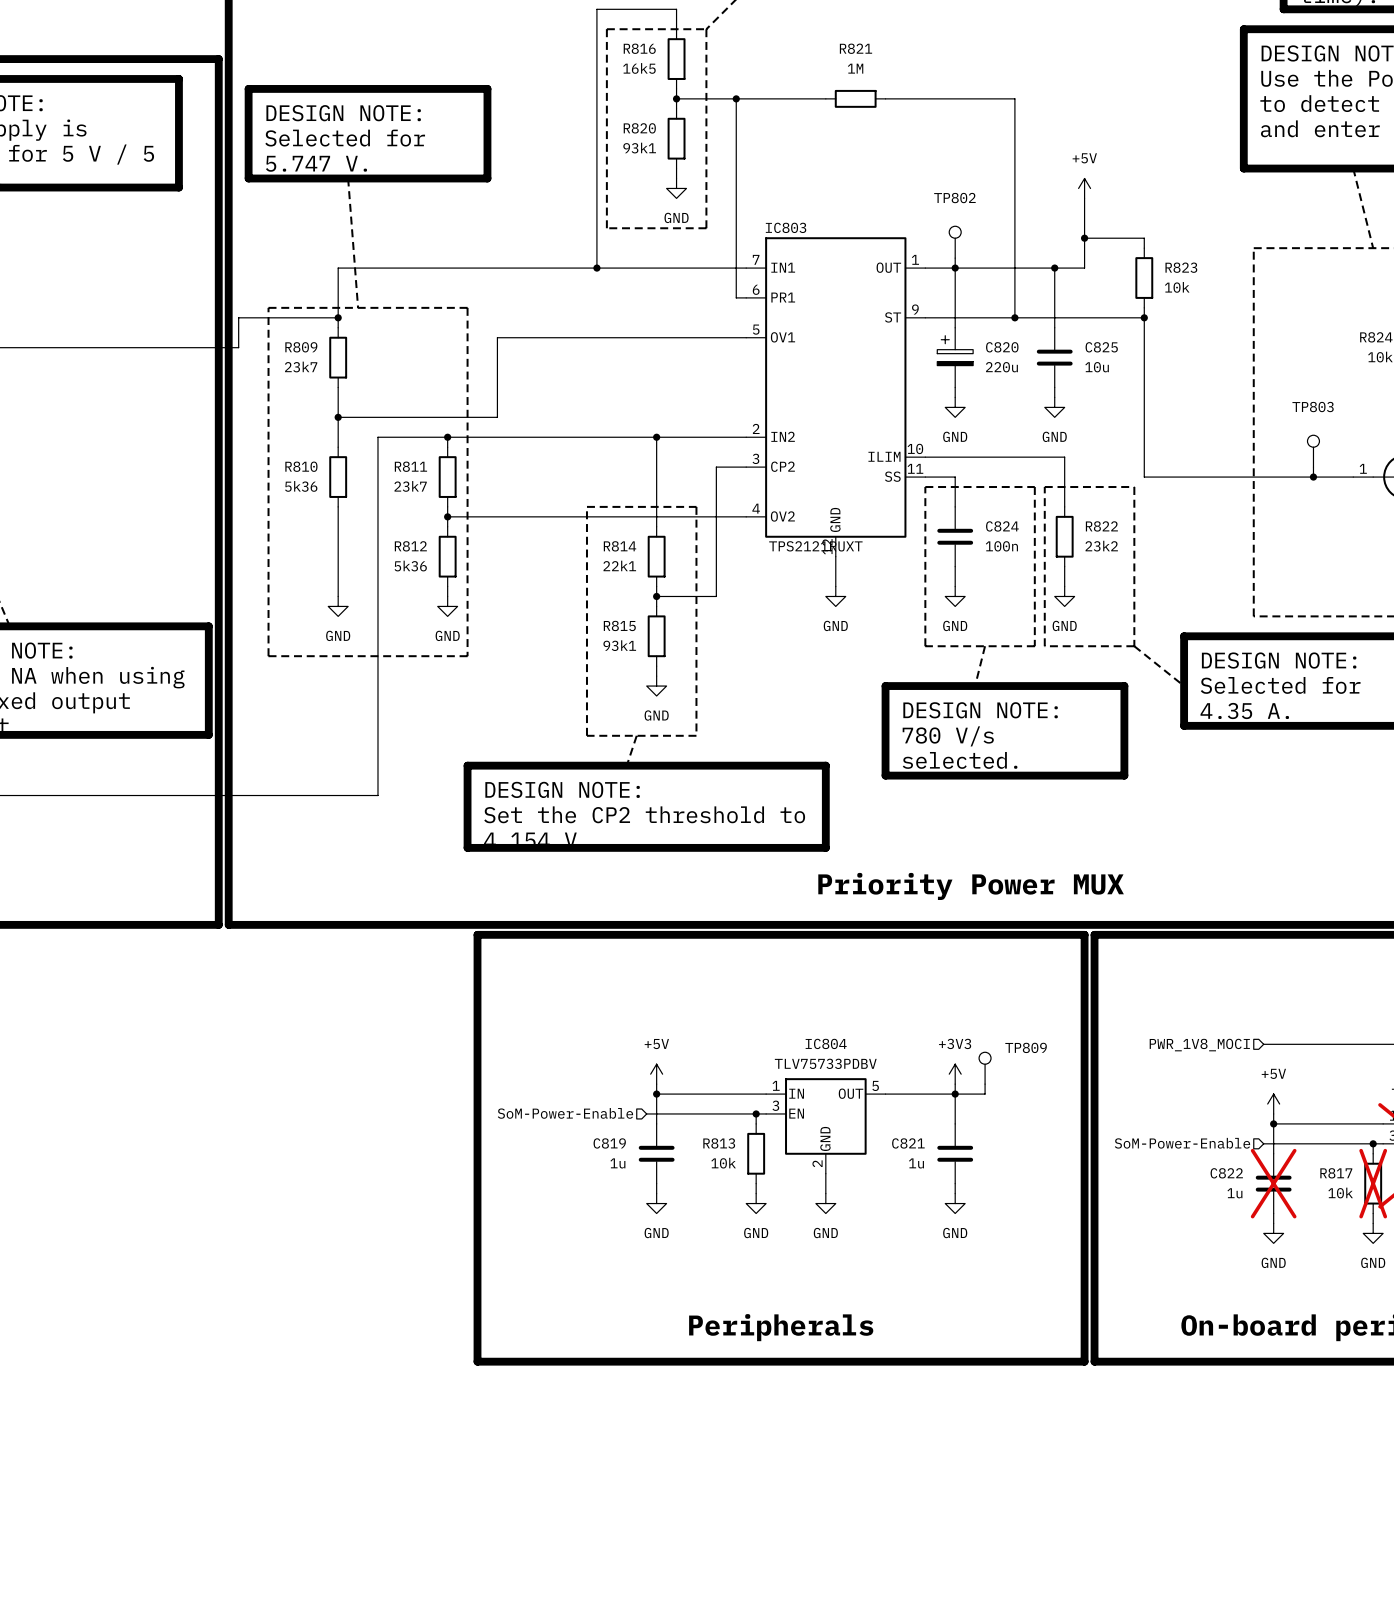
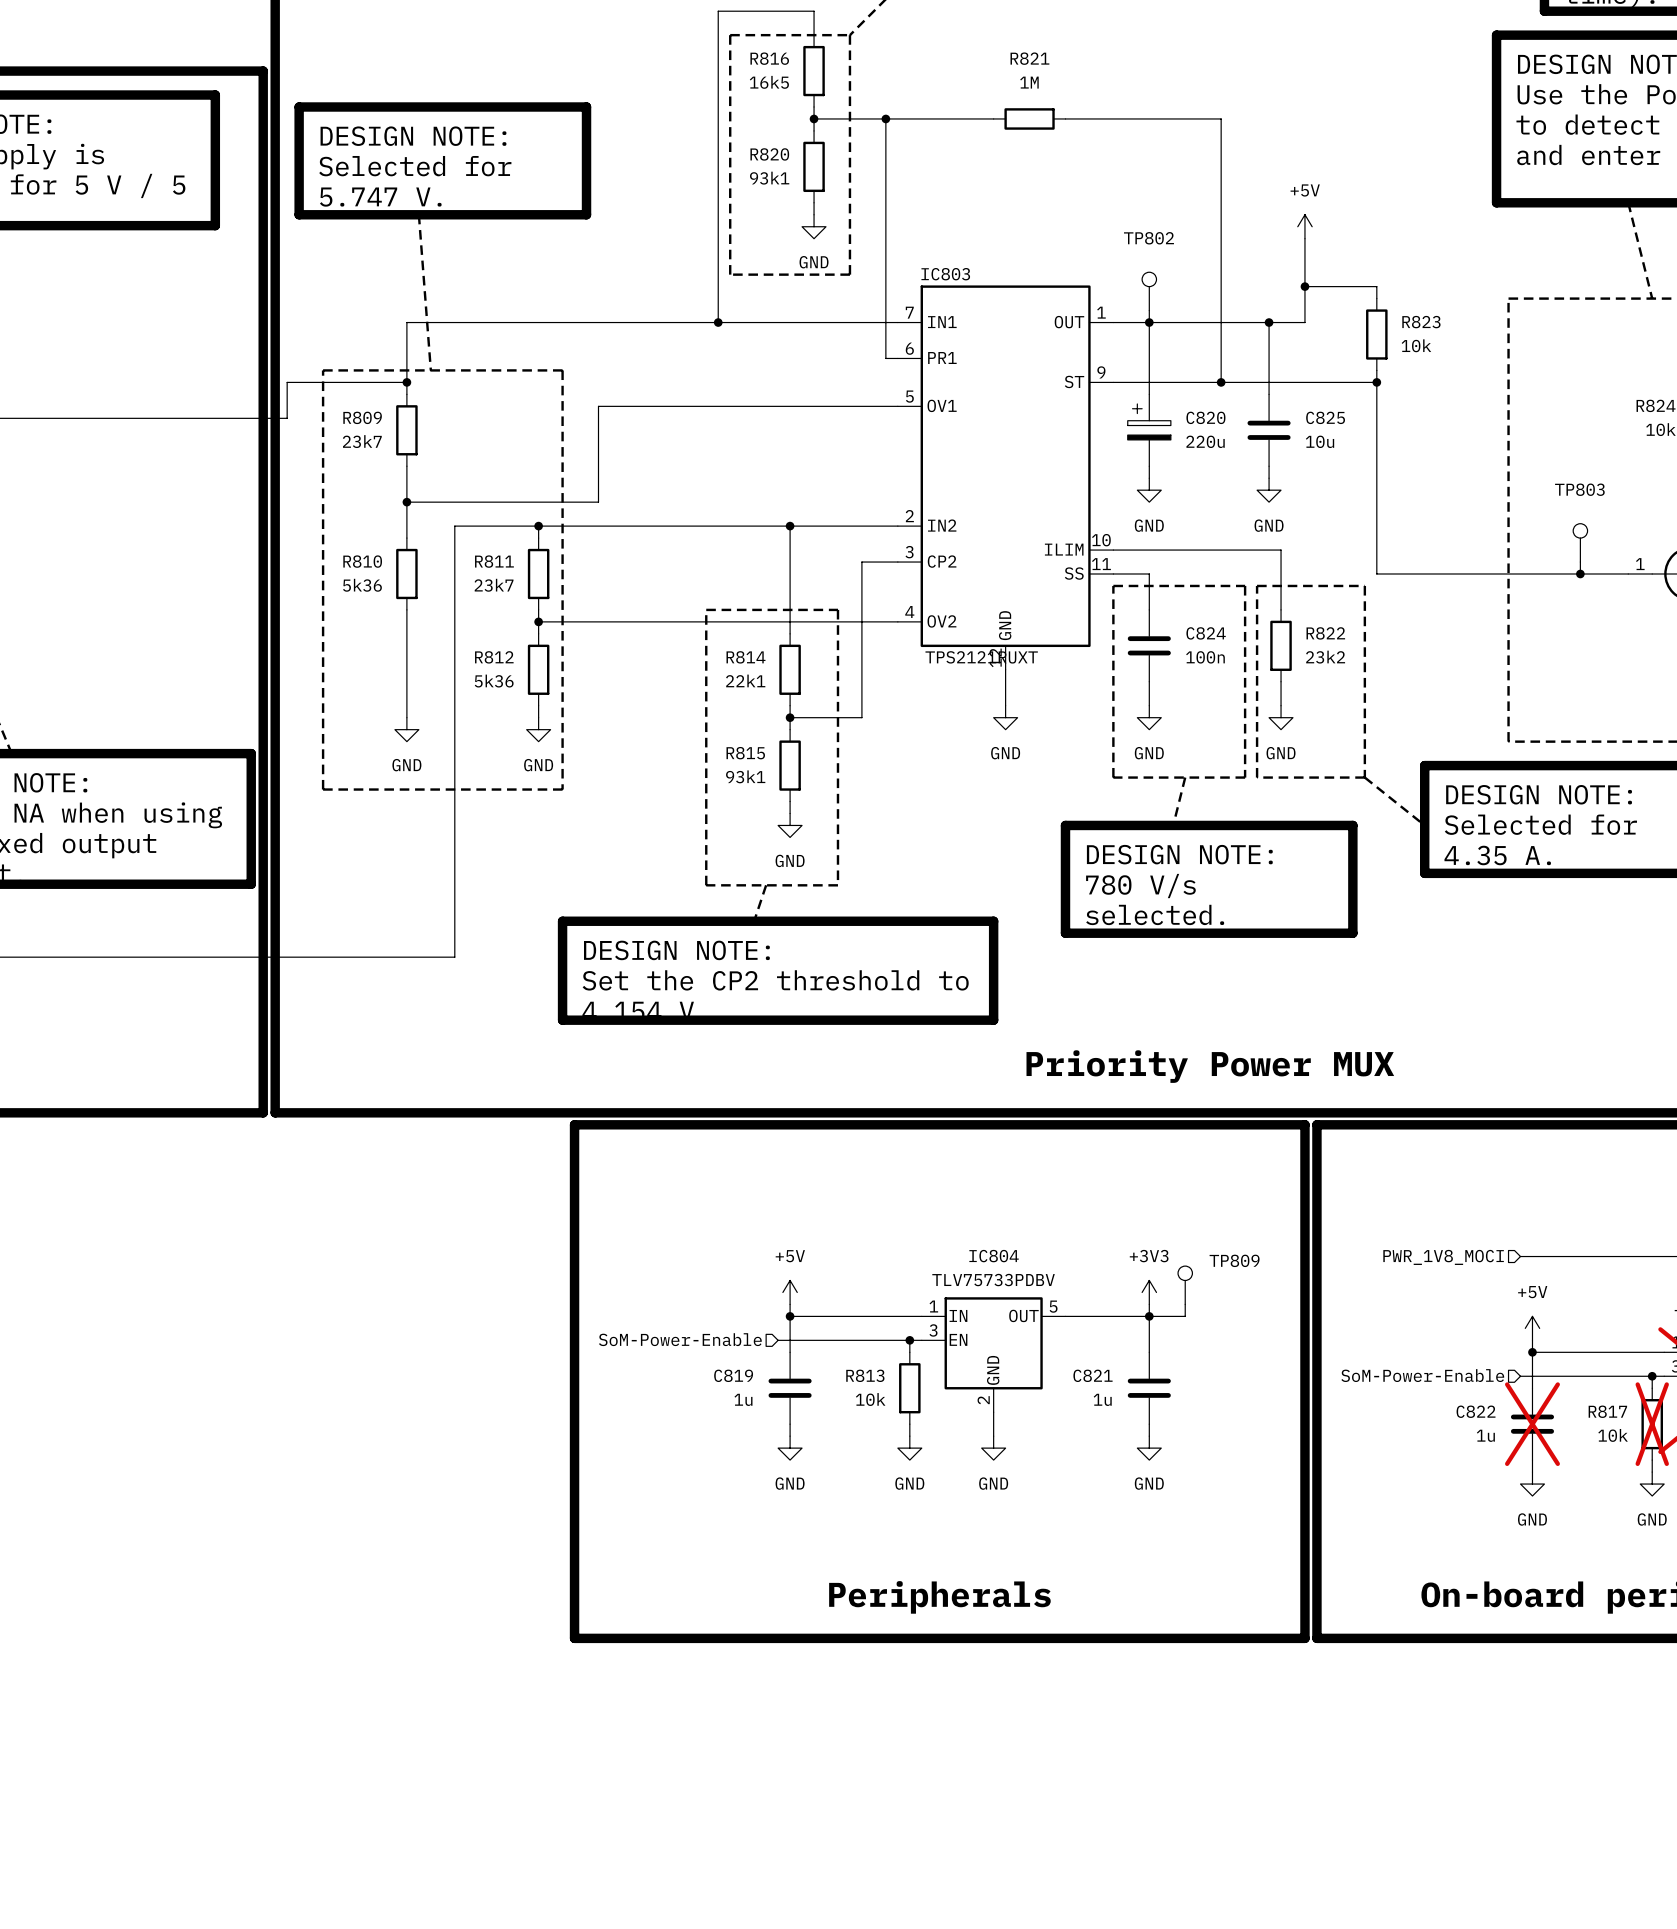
text position: Priority Power MUX (971, 886) -> Priority Power MUX (1210, 1066)

